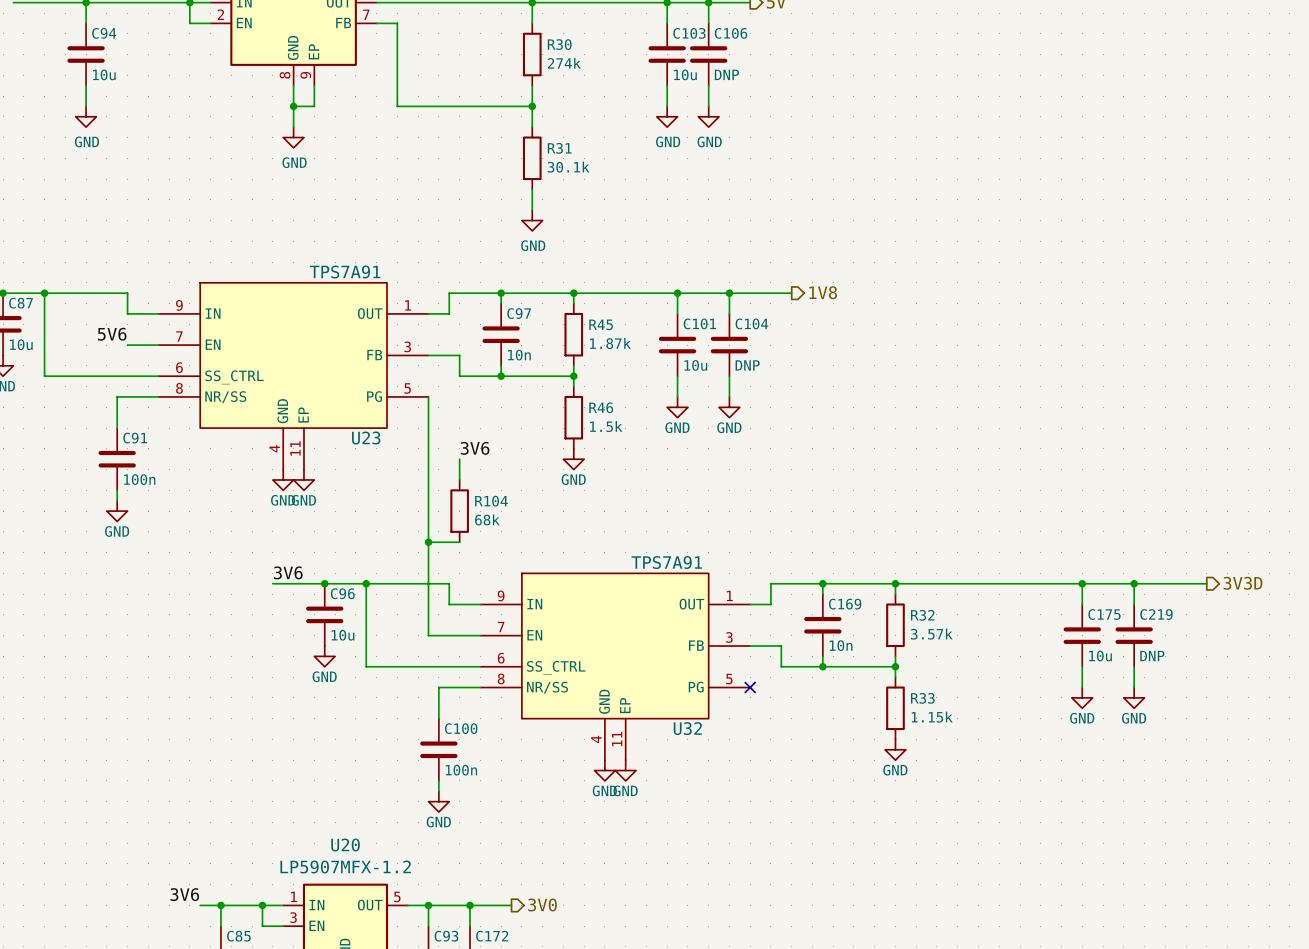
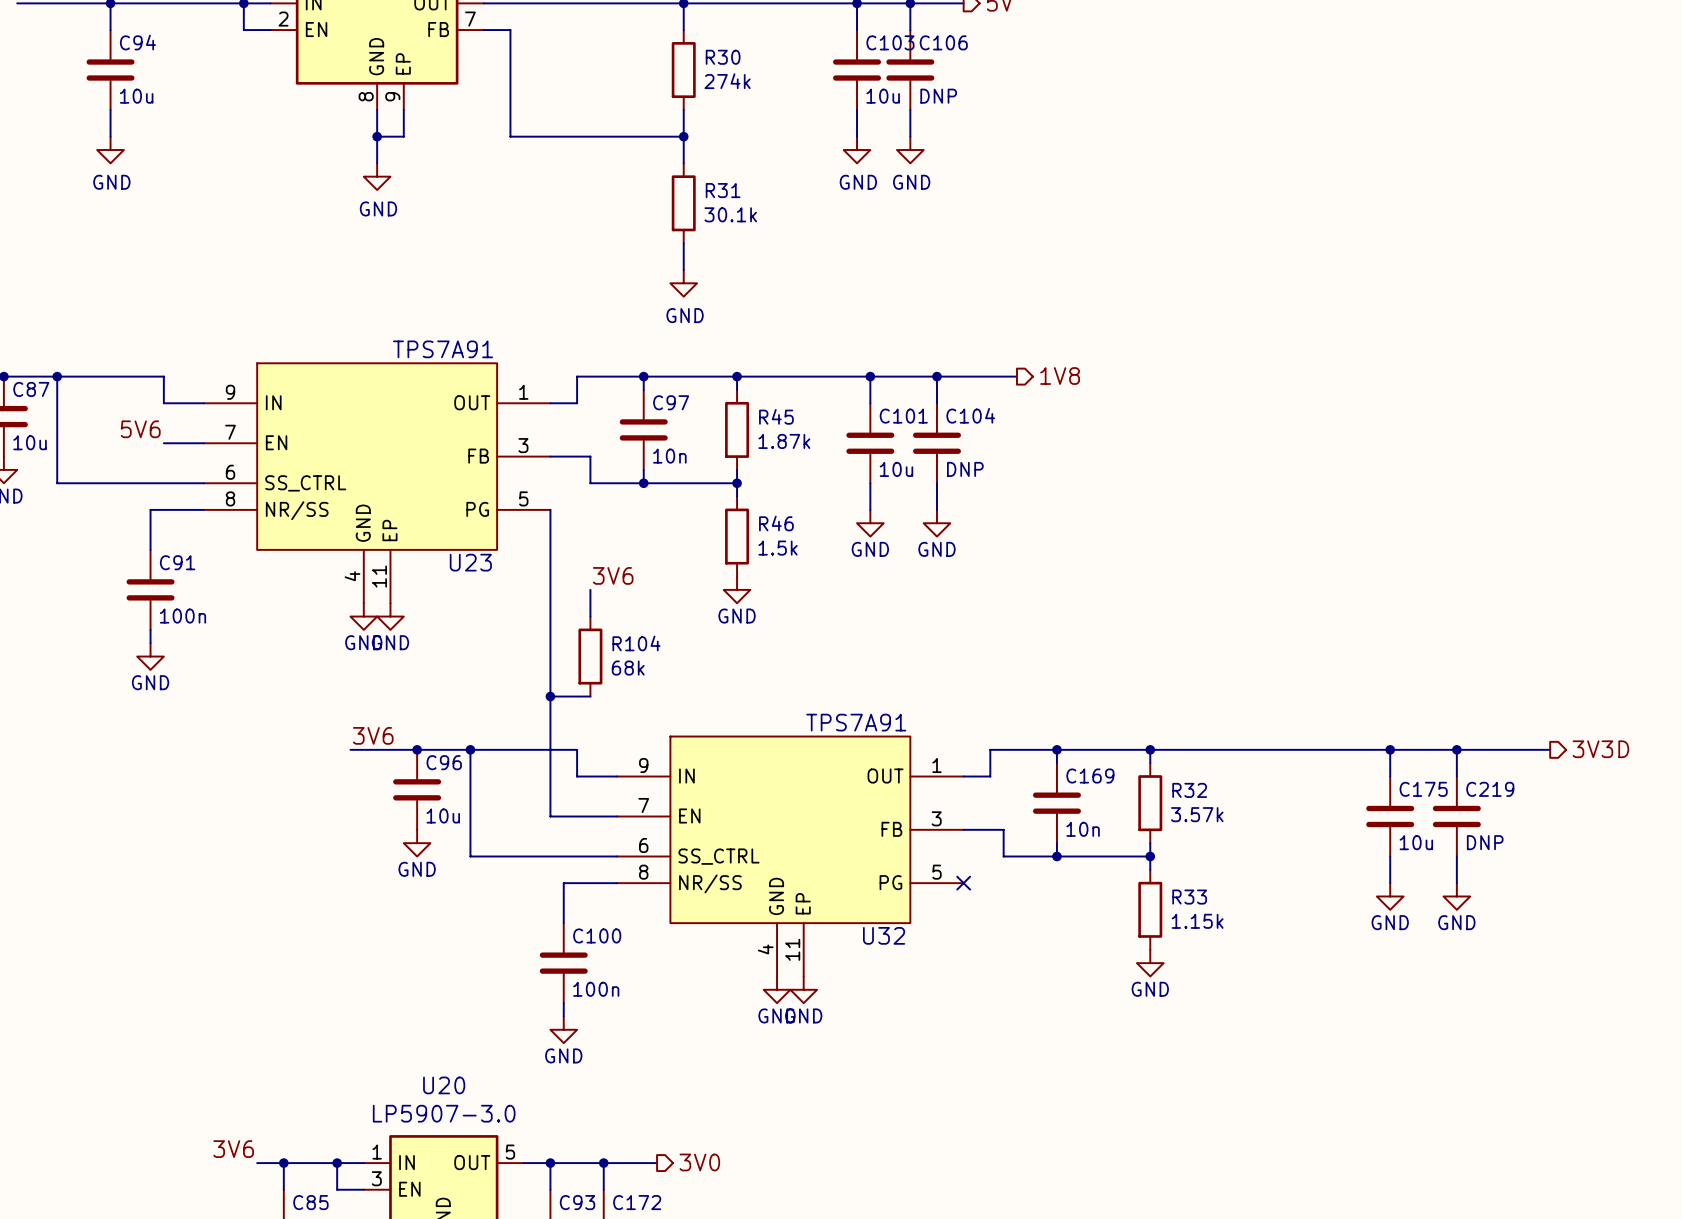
U20 value: LP5907MFX-1.2 (345, 867) -> LP5907-3.0 (444, 1113)

